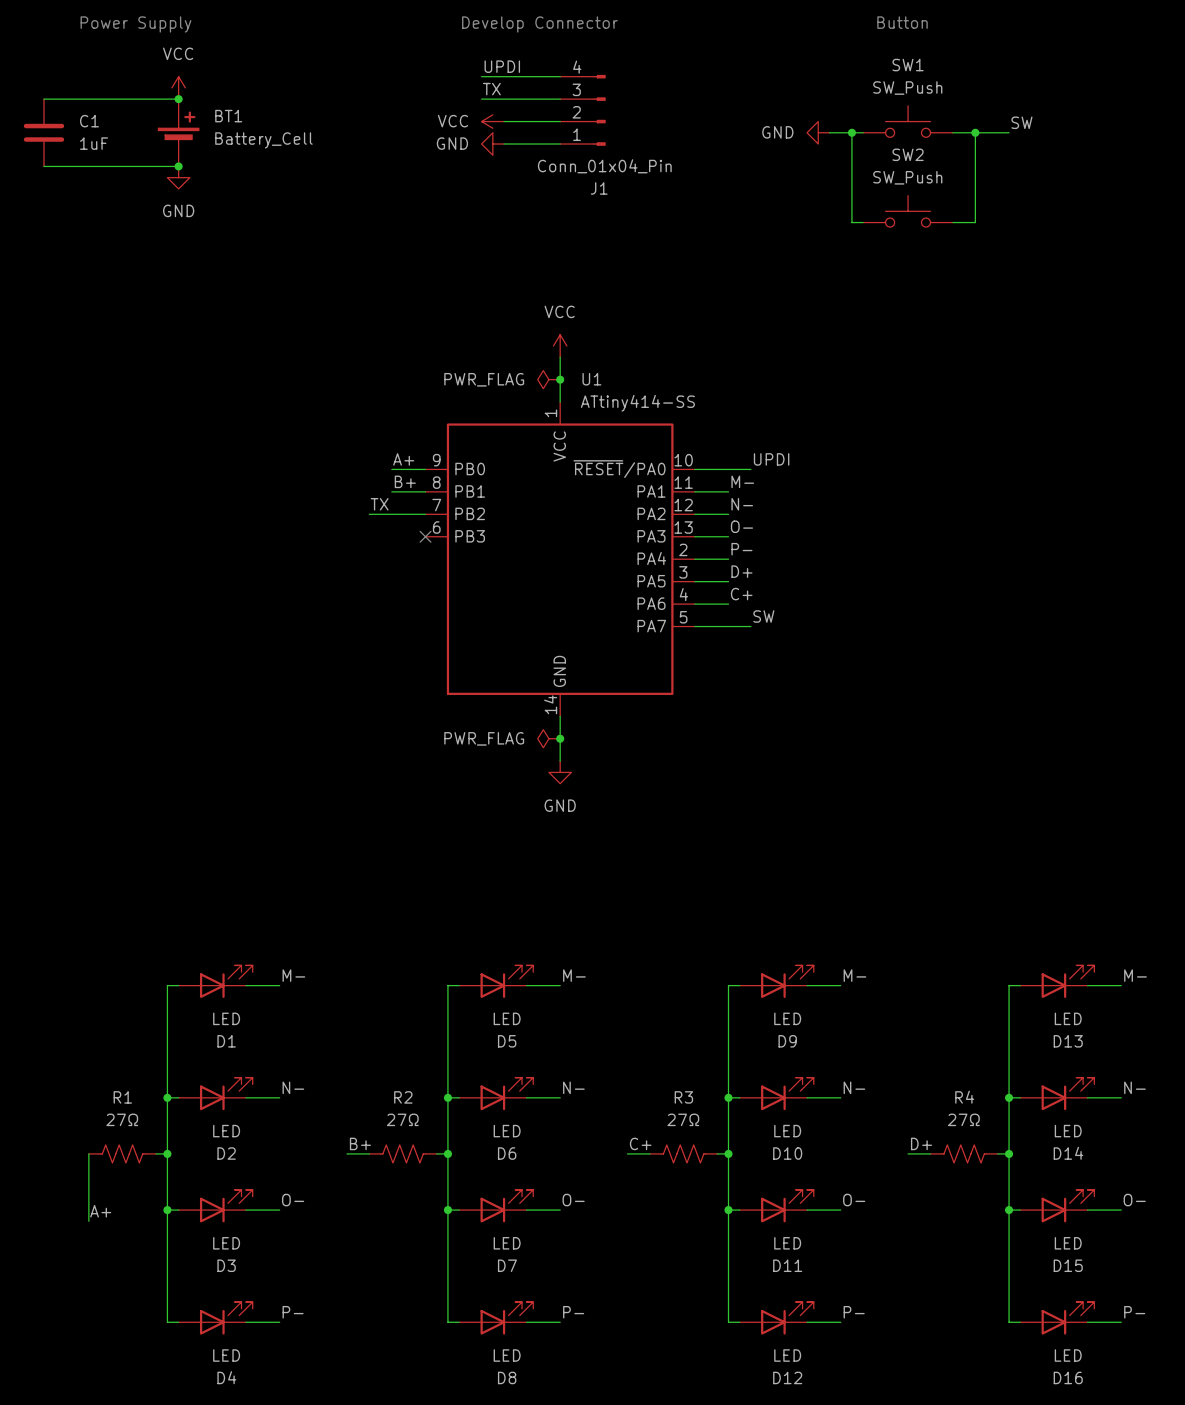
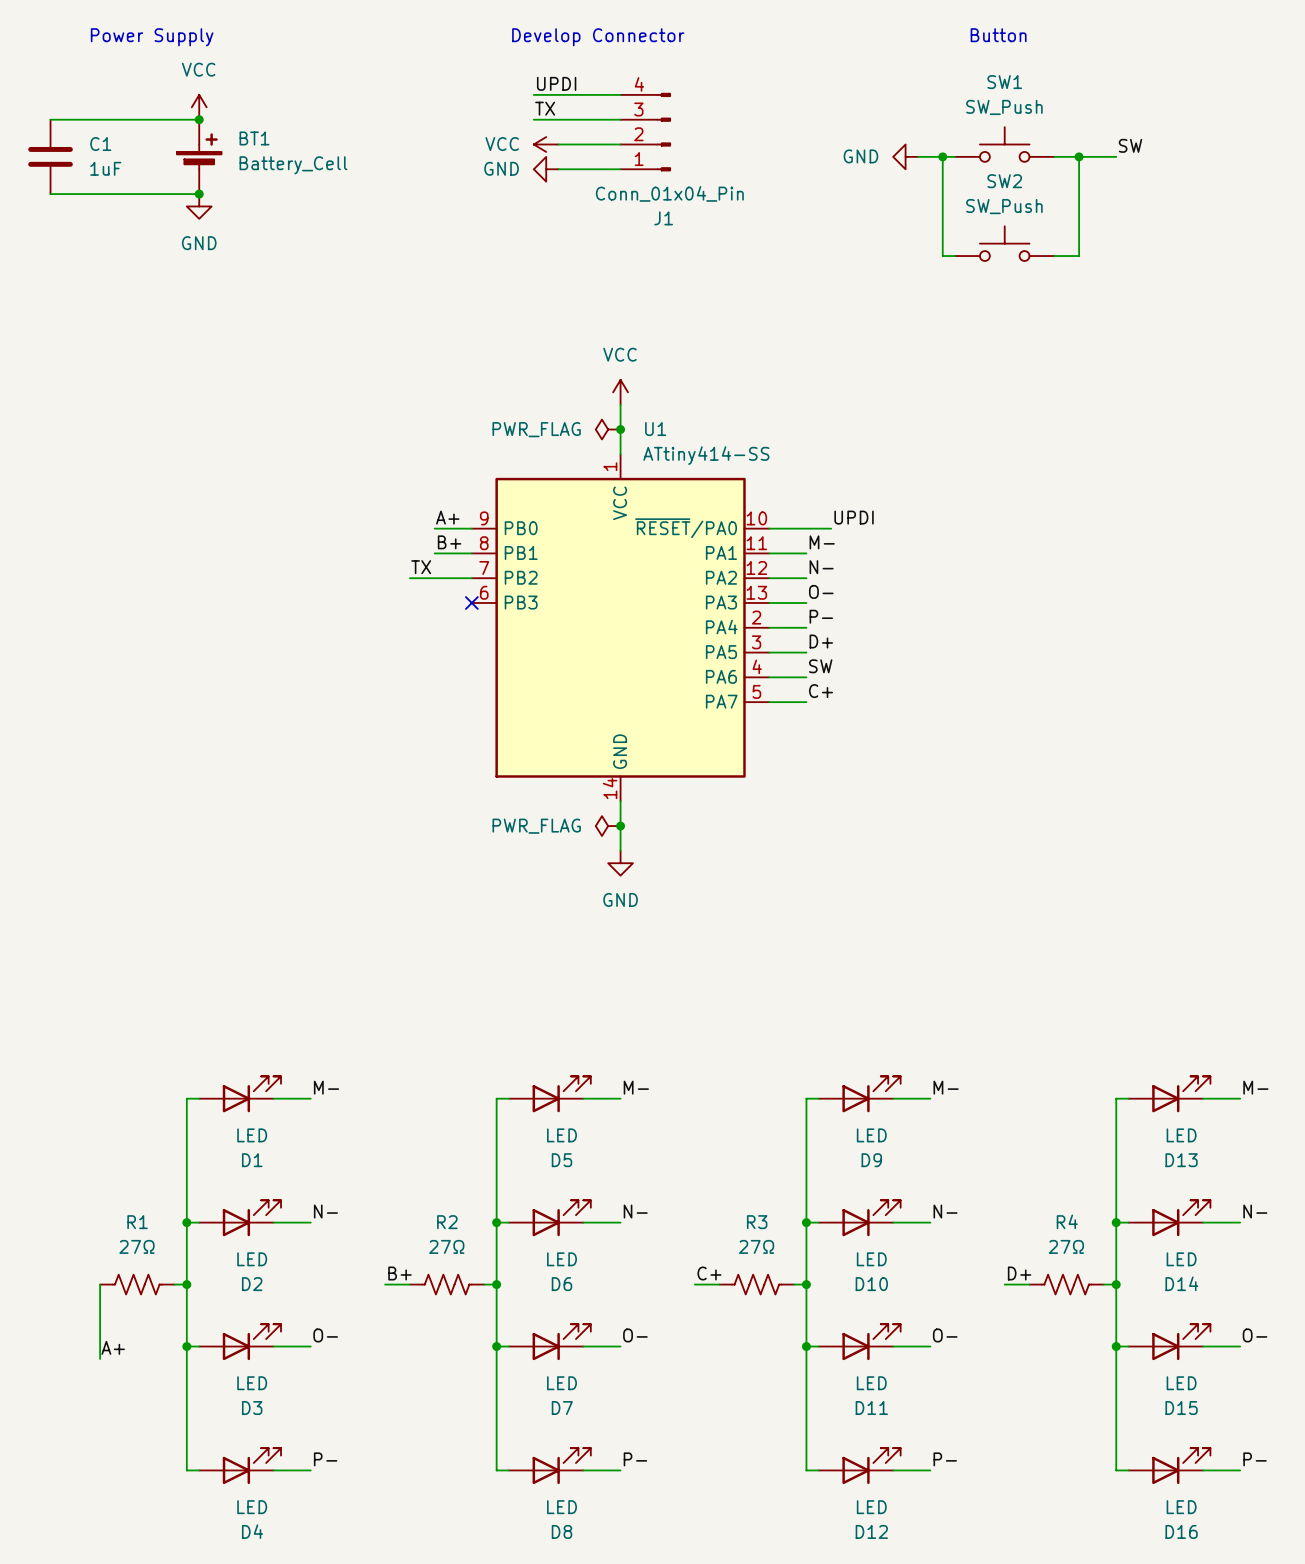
label: C+ (741, 594) -> SW (820, 666)
label: none -> C+ (820, 691)
label: SW (763, 616) -> none
wire: (728, 626) (750, 626) -> none

